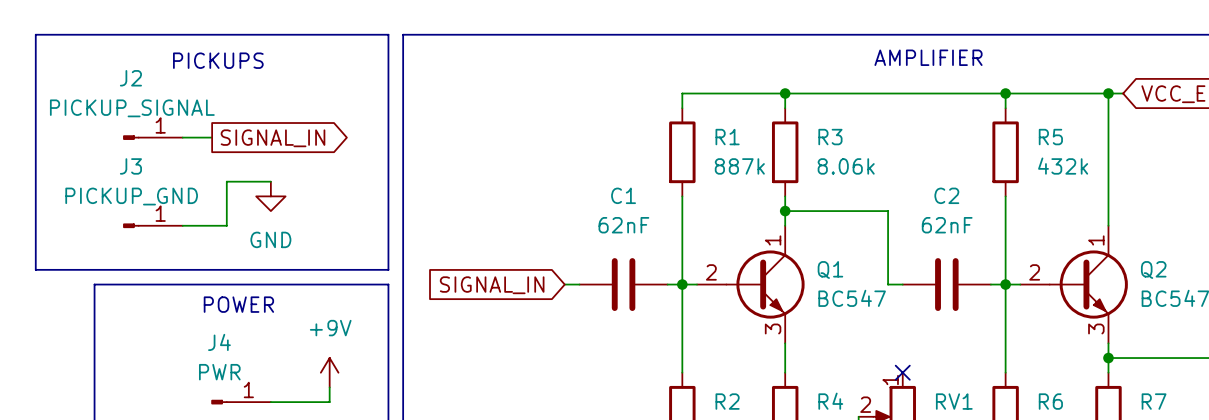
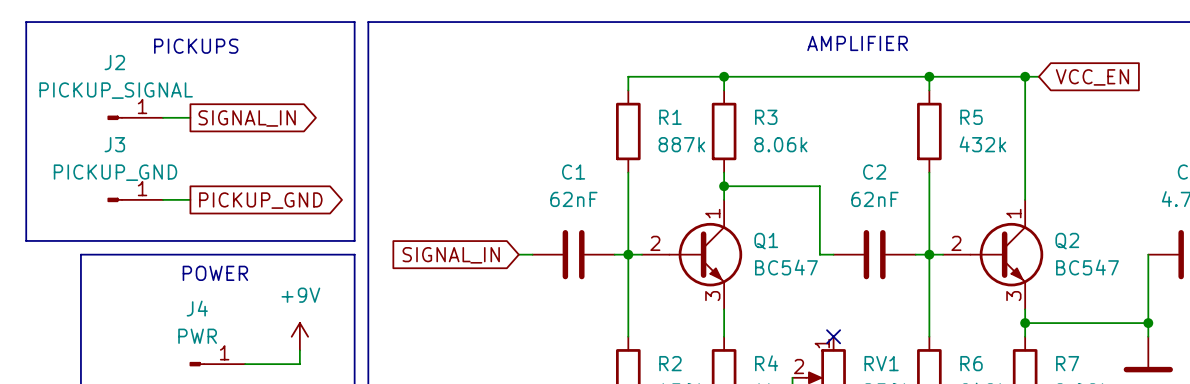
wire: (270, 181) (226, 181) (226, 225) (212, 225) -> none
power symbol: GND (270, 196) -> none
global label: none -> PICKUP_GND (260, 200)

